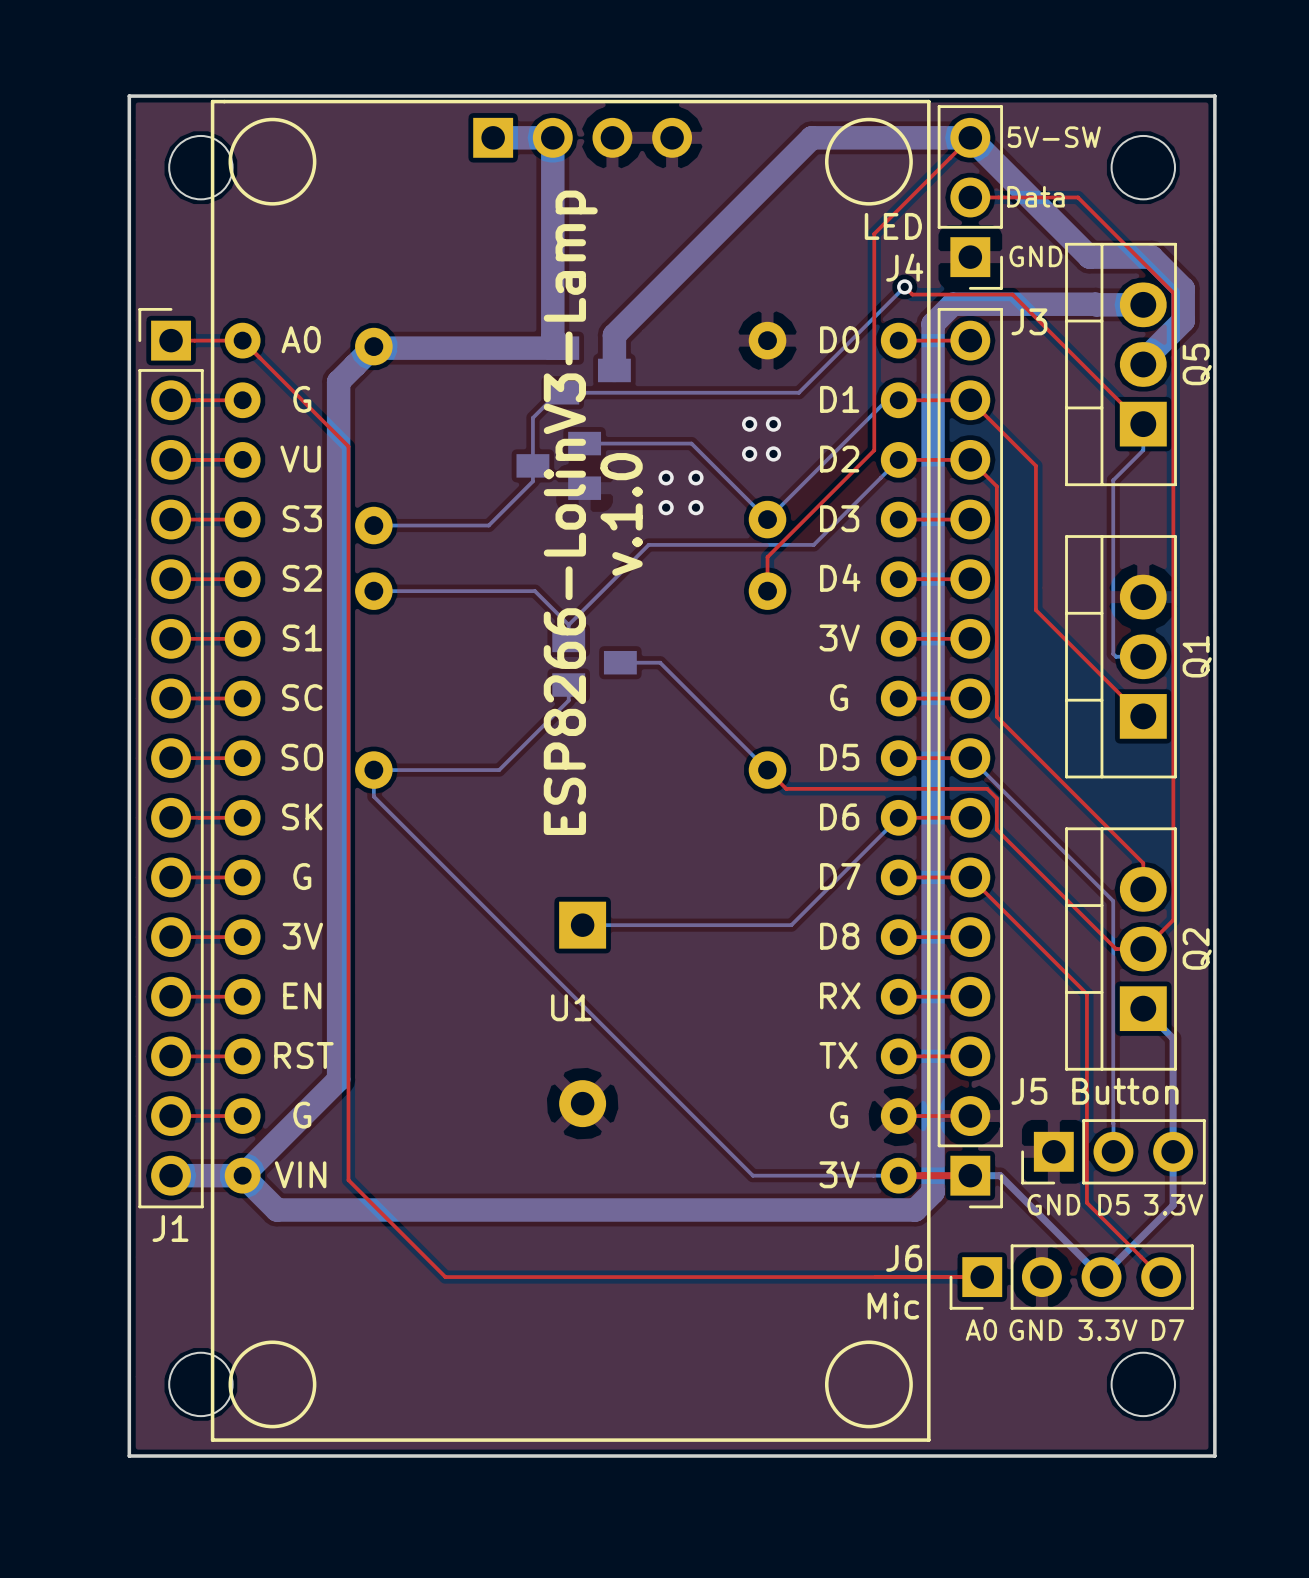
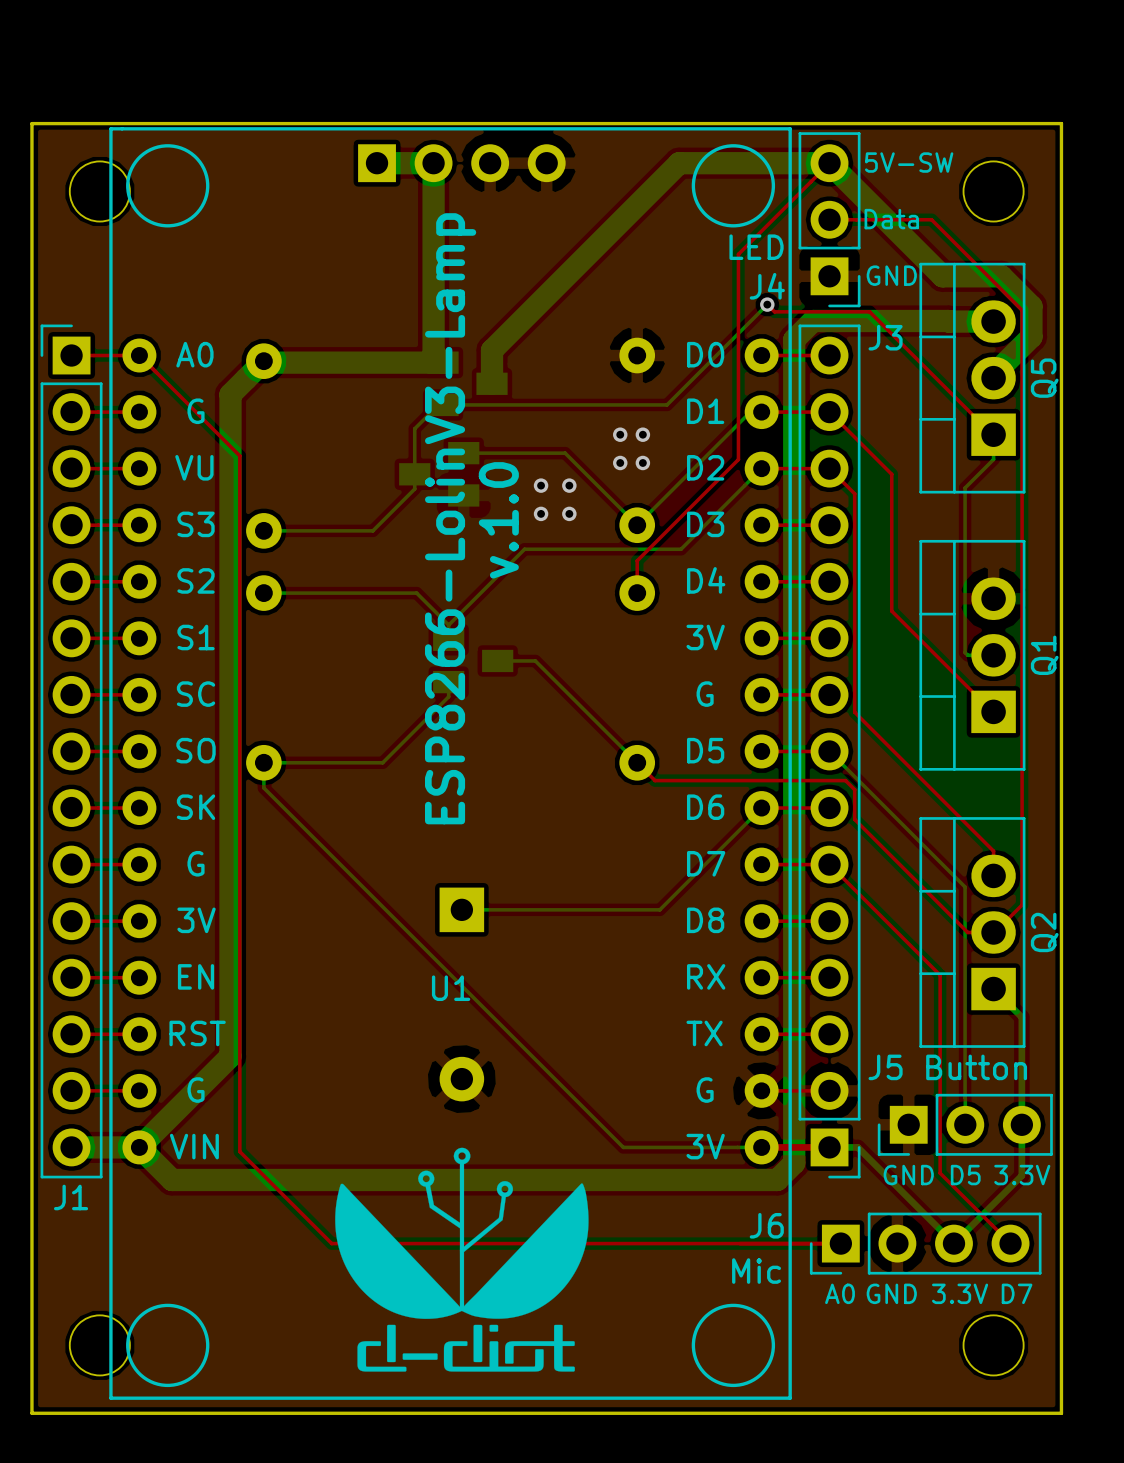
drawing: none -> [335, 1147, 589, 1372]

